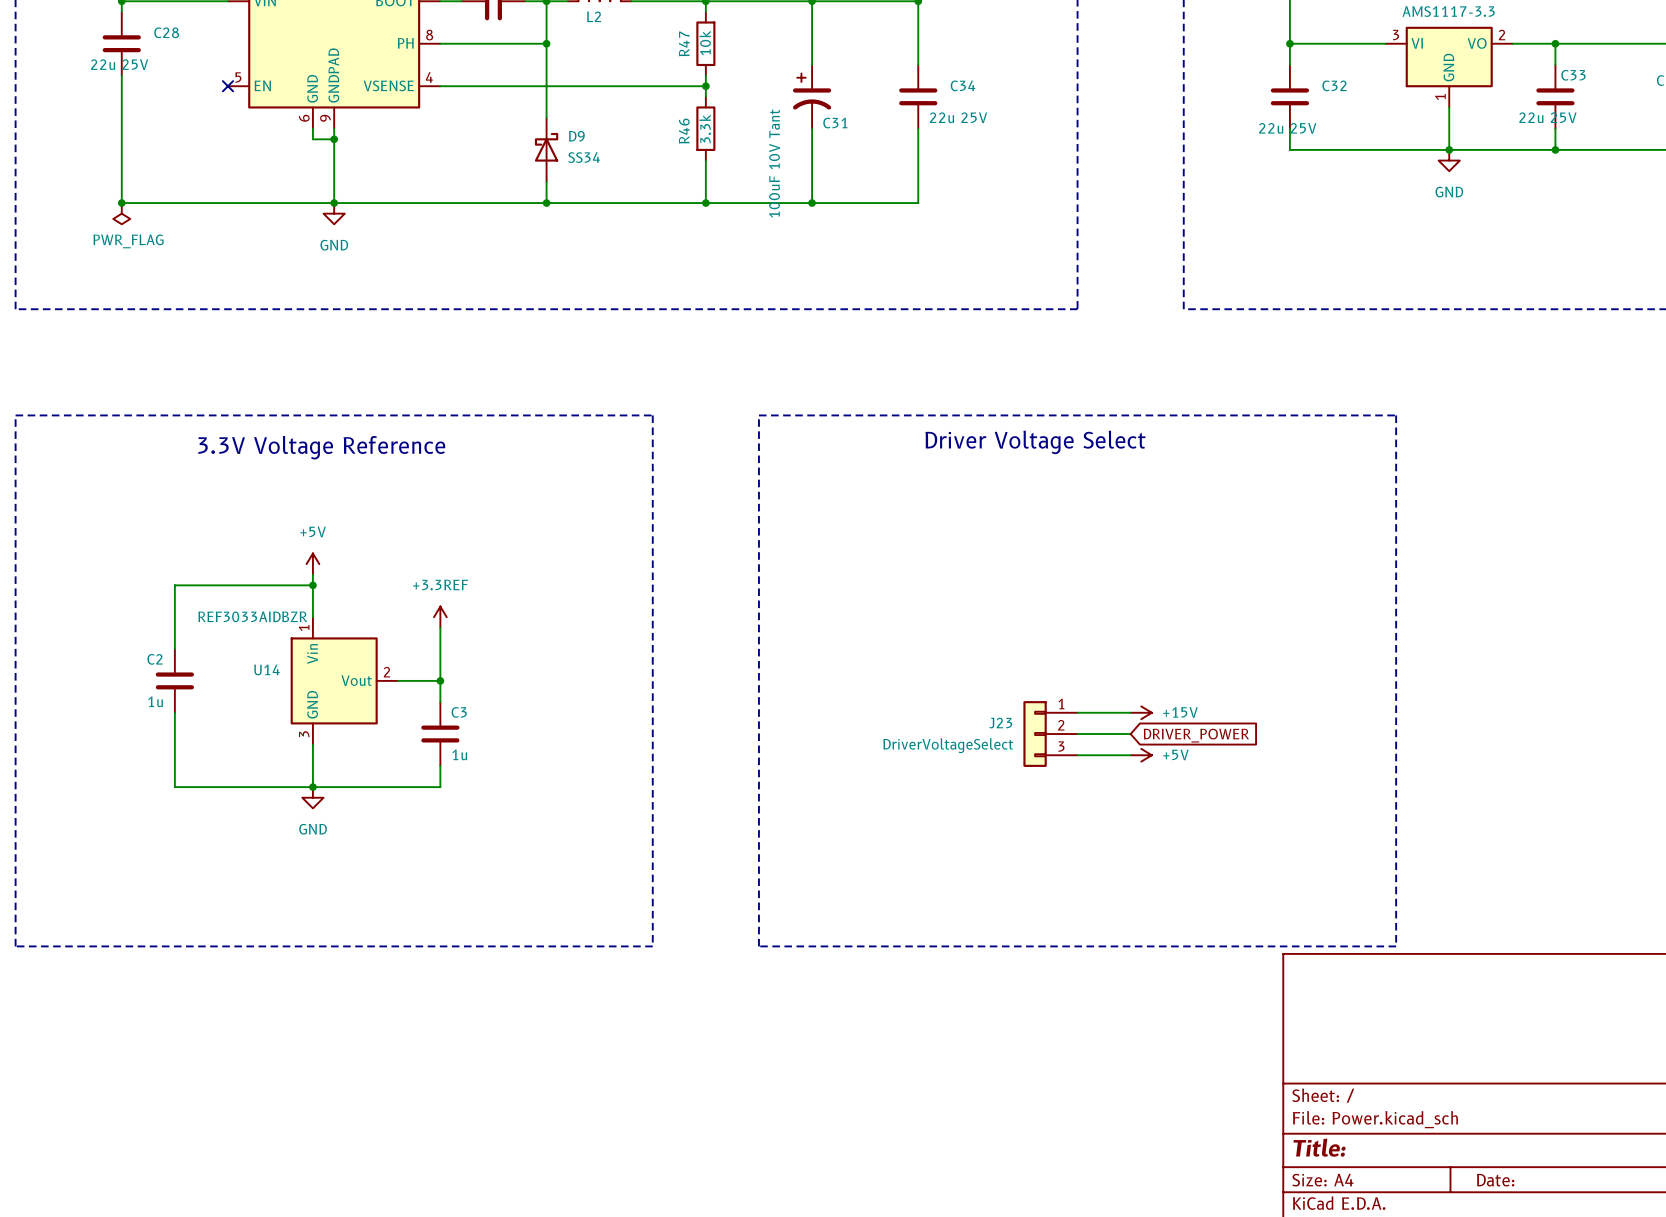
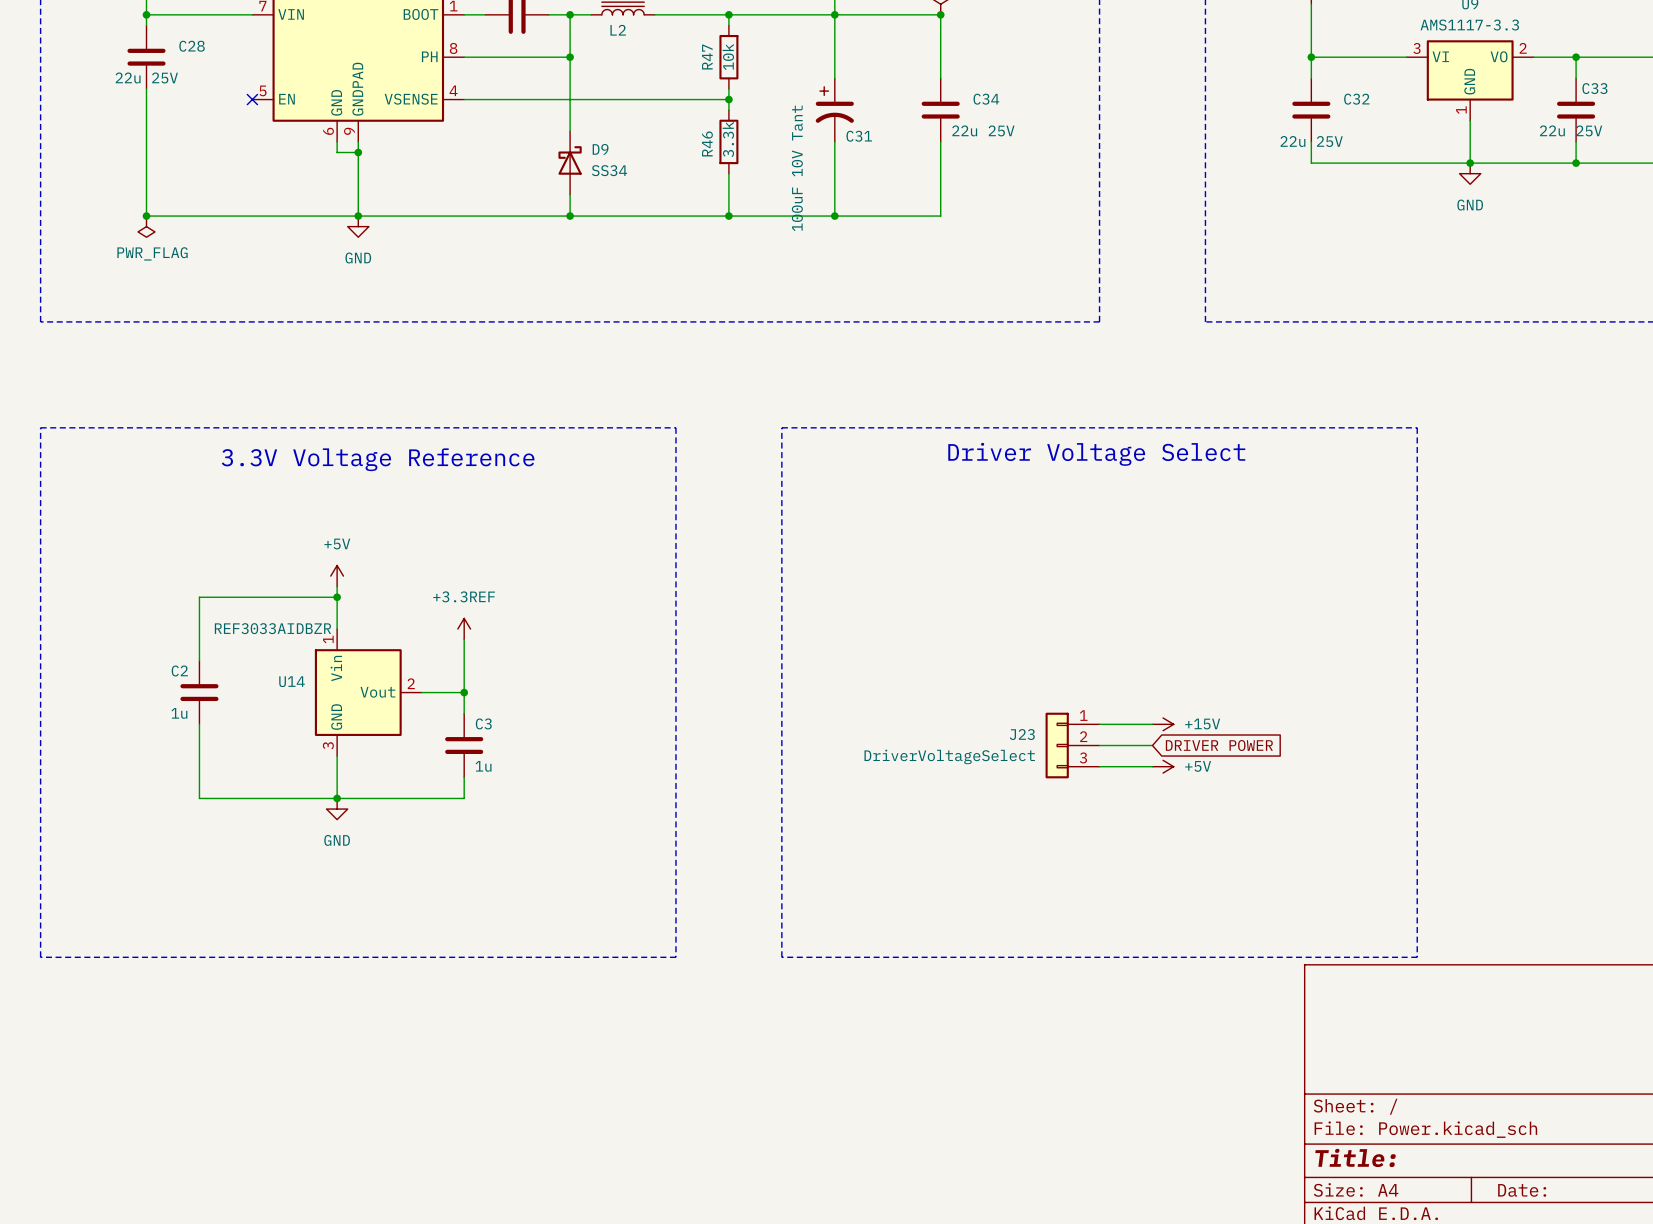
global label: DRIVER_POWER (1196, 735) -> DRIVER POWER (1219, 745)

